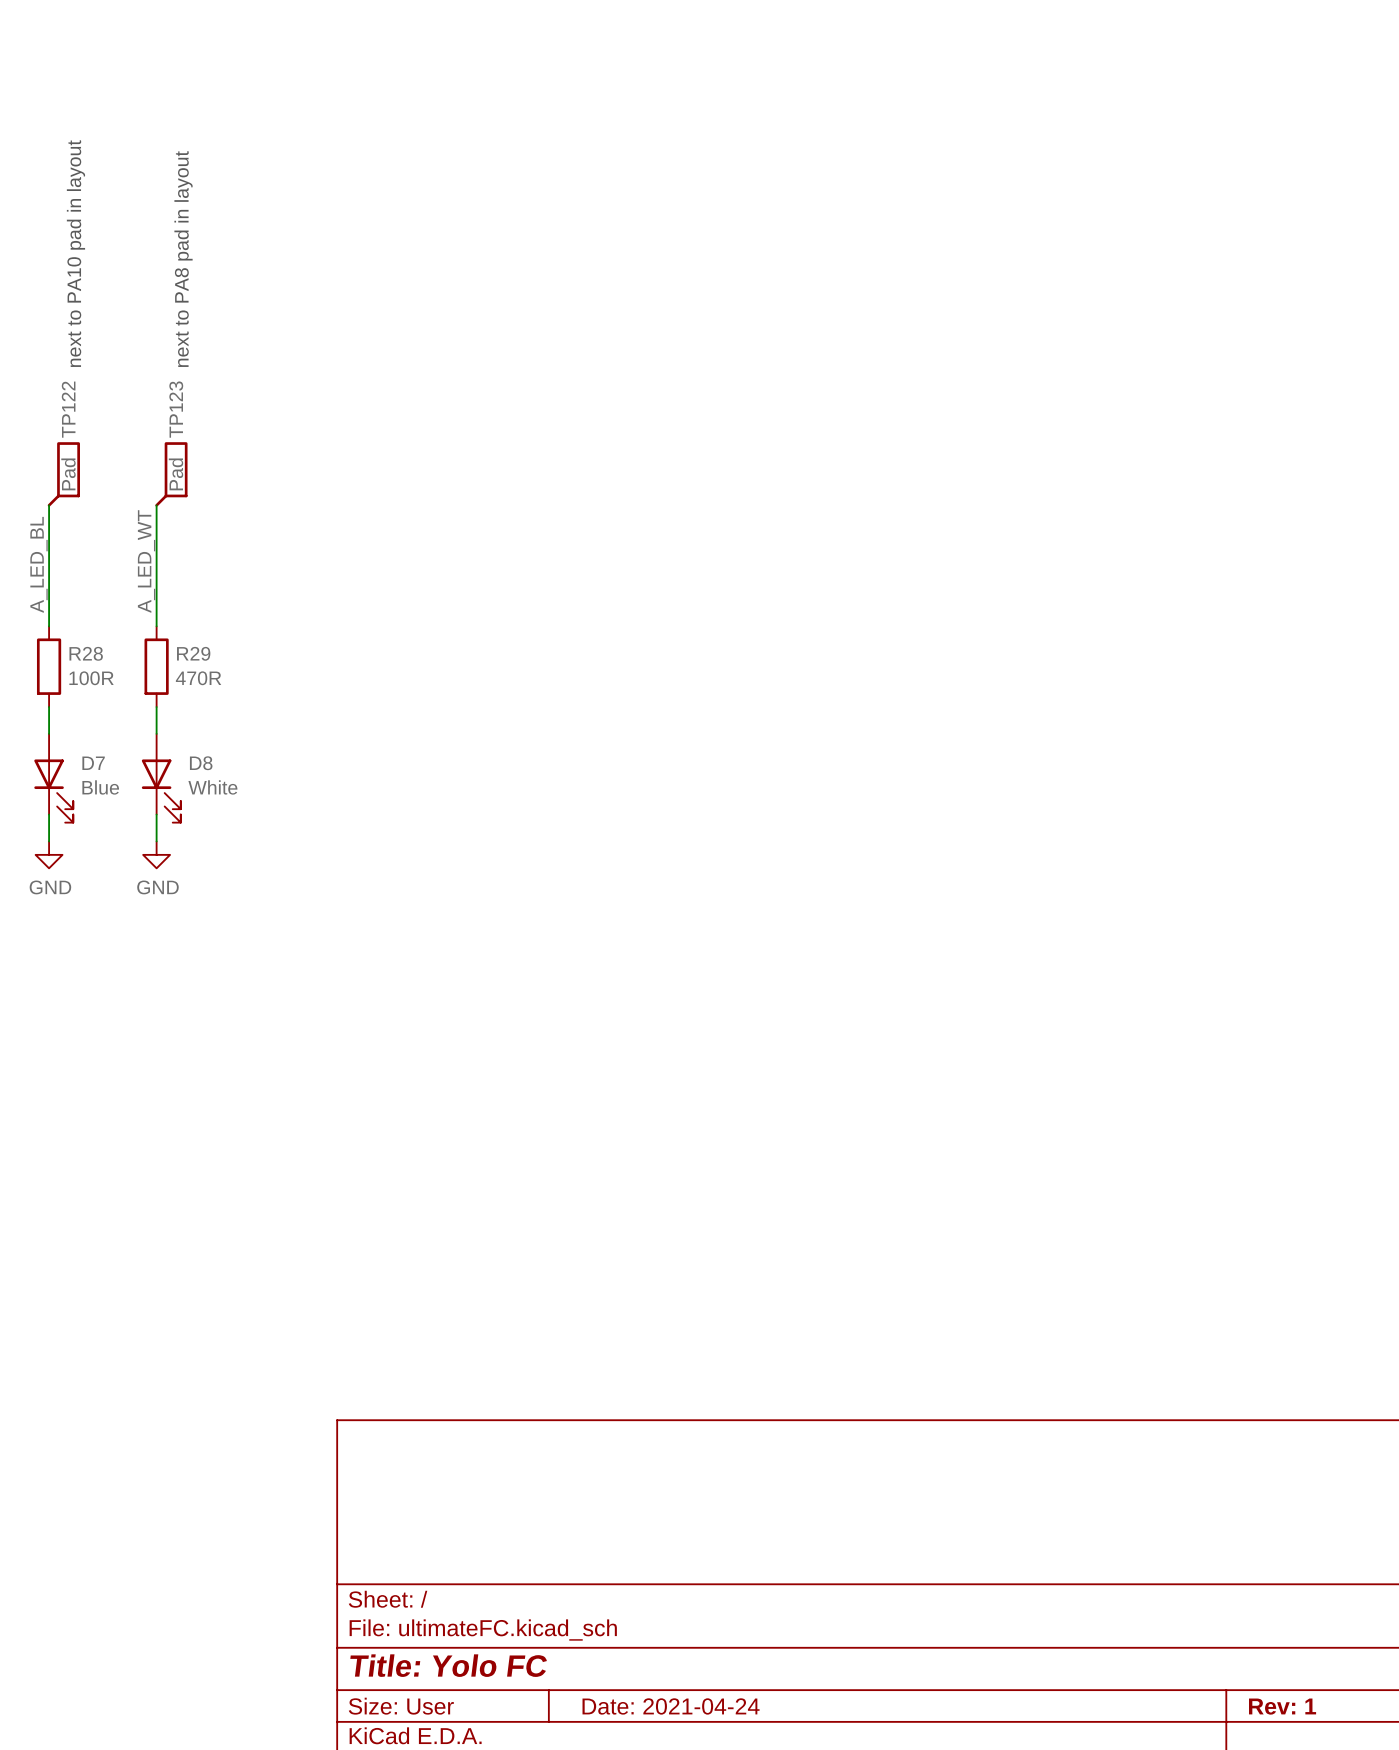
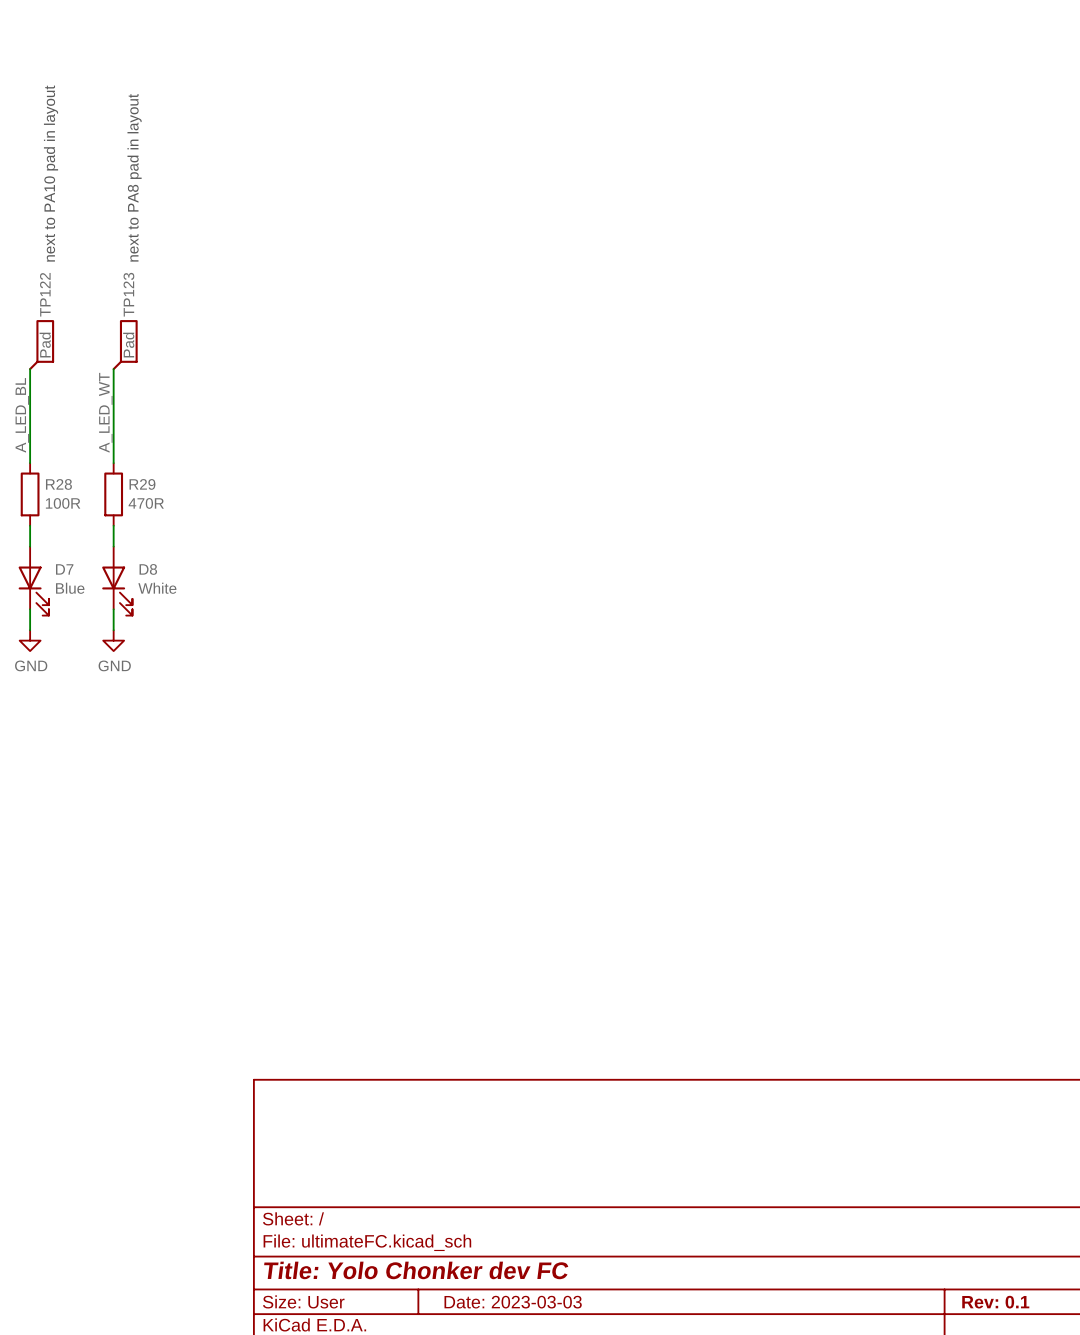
title block: Title: Yolo FC (448, 1665) -> Title: Yolo Chonker dev FC (416, 1270)
title block: Date: 2021-04-24 (671, 1706) -> Date: 2023-03-03 (513, 1302)
title block: Rev: 1 (1282, 1706) -> Rev: 0.1 (995, 1302)

